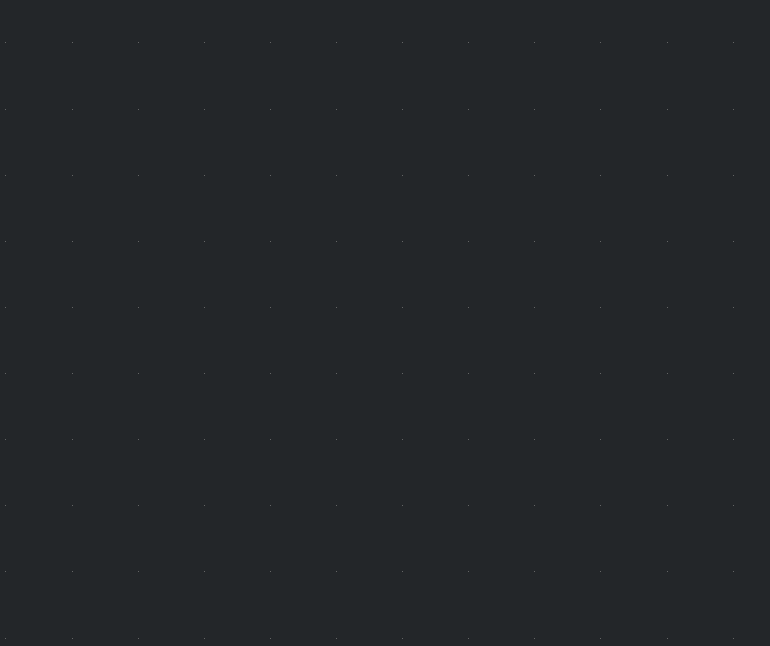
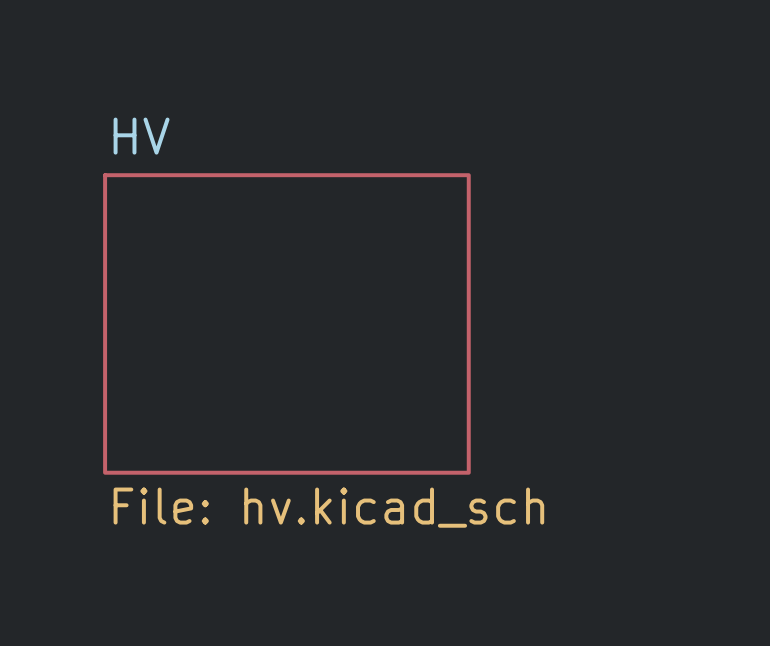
sheet HV: none -> File: hv.kicad_sch (286, 323)

